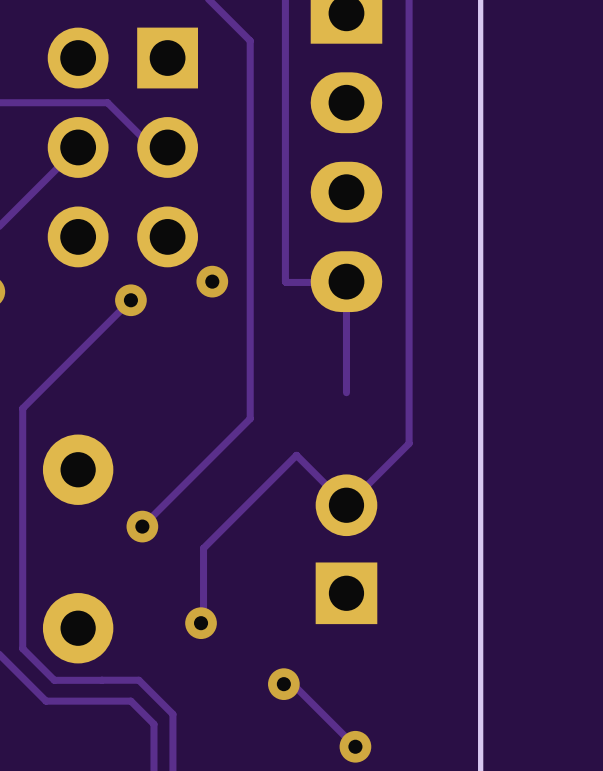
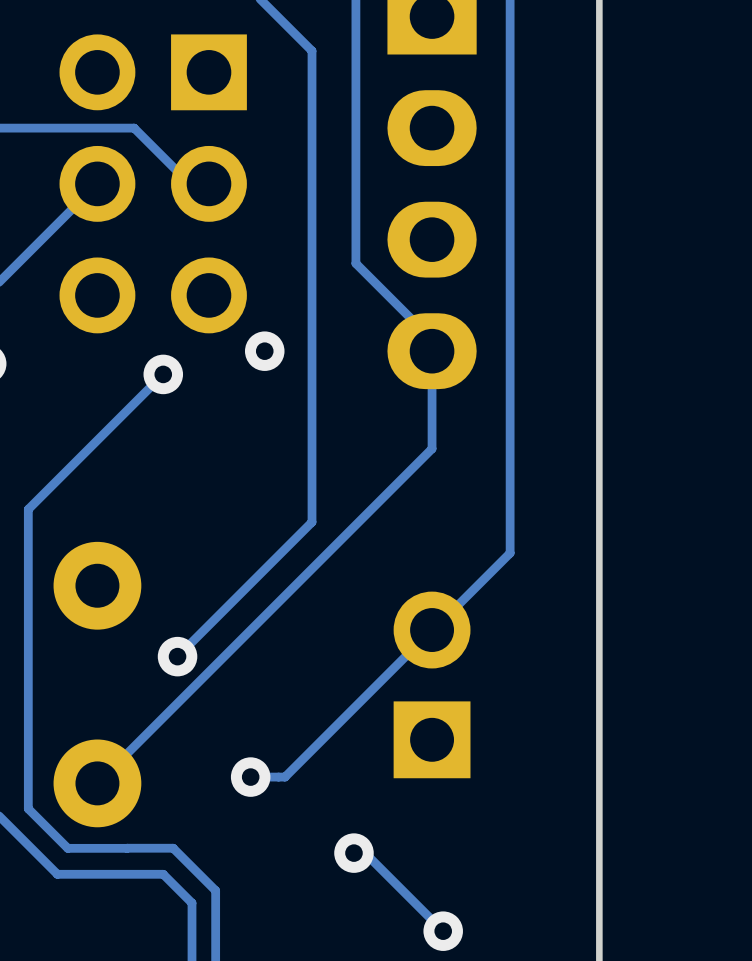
track: (285, 211) (285, 281) (346, 281) -> (355, 263) (412, 320) (412, 332) (432, 351)
track: (346, 359) (346, 392) -> (432, 448) (97, 783)
track: (346, 505) (296, 455) (203, 548) (203, 623) -> (432, 630) (285, 777) (253, 777)

